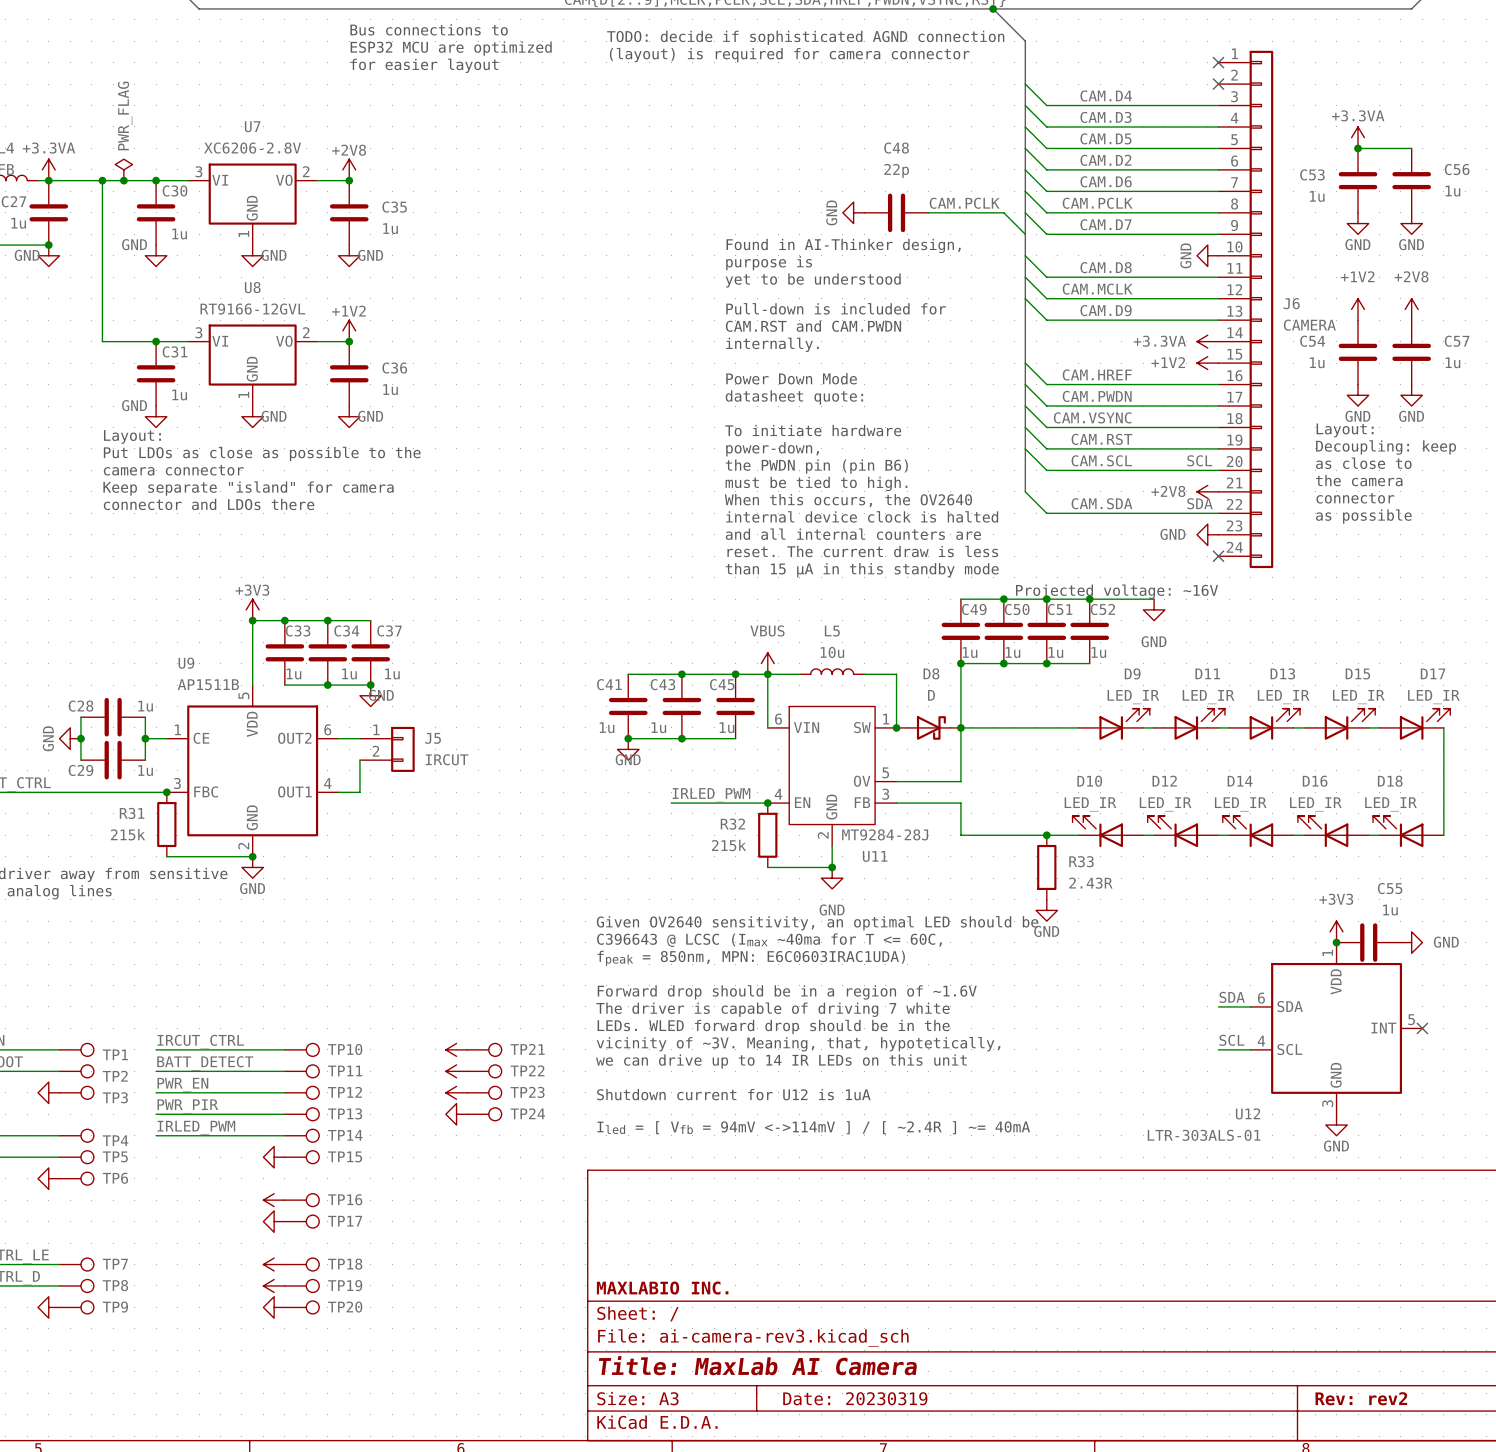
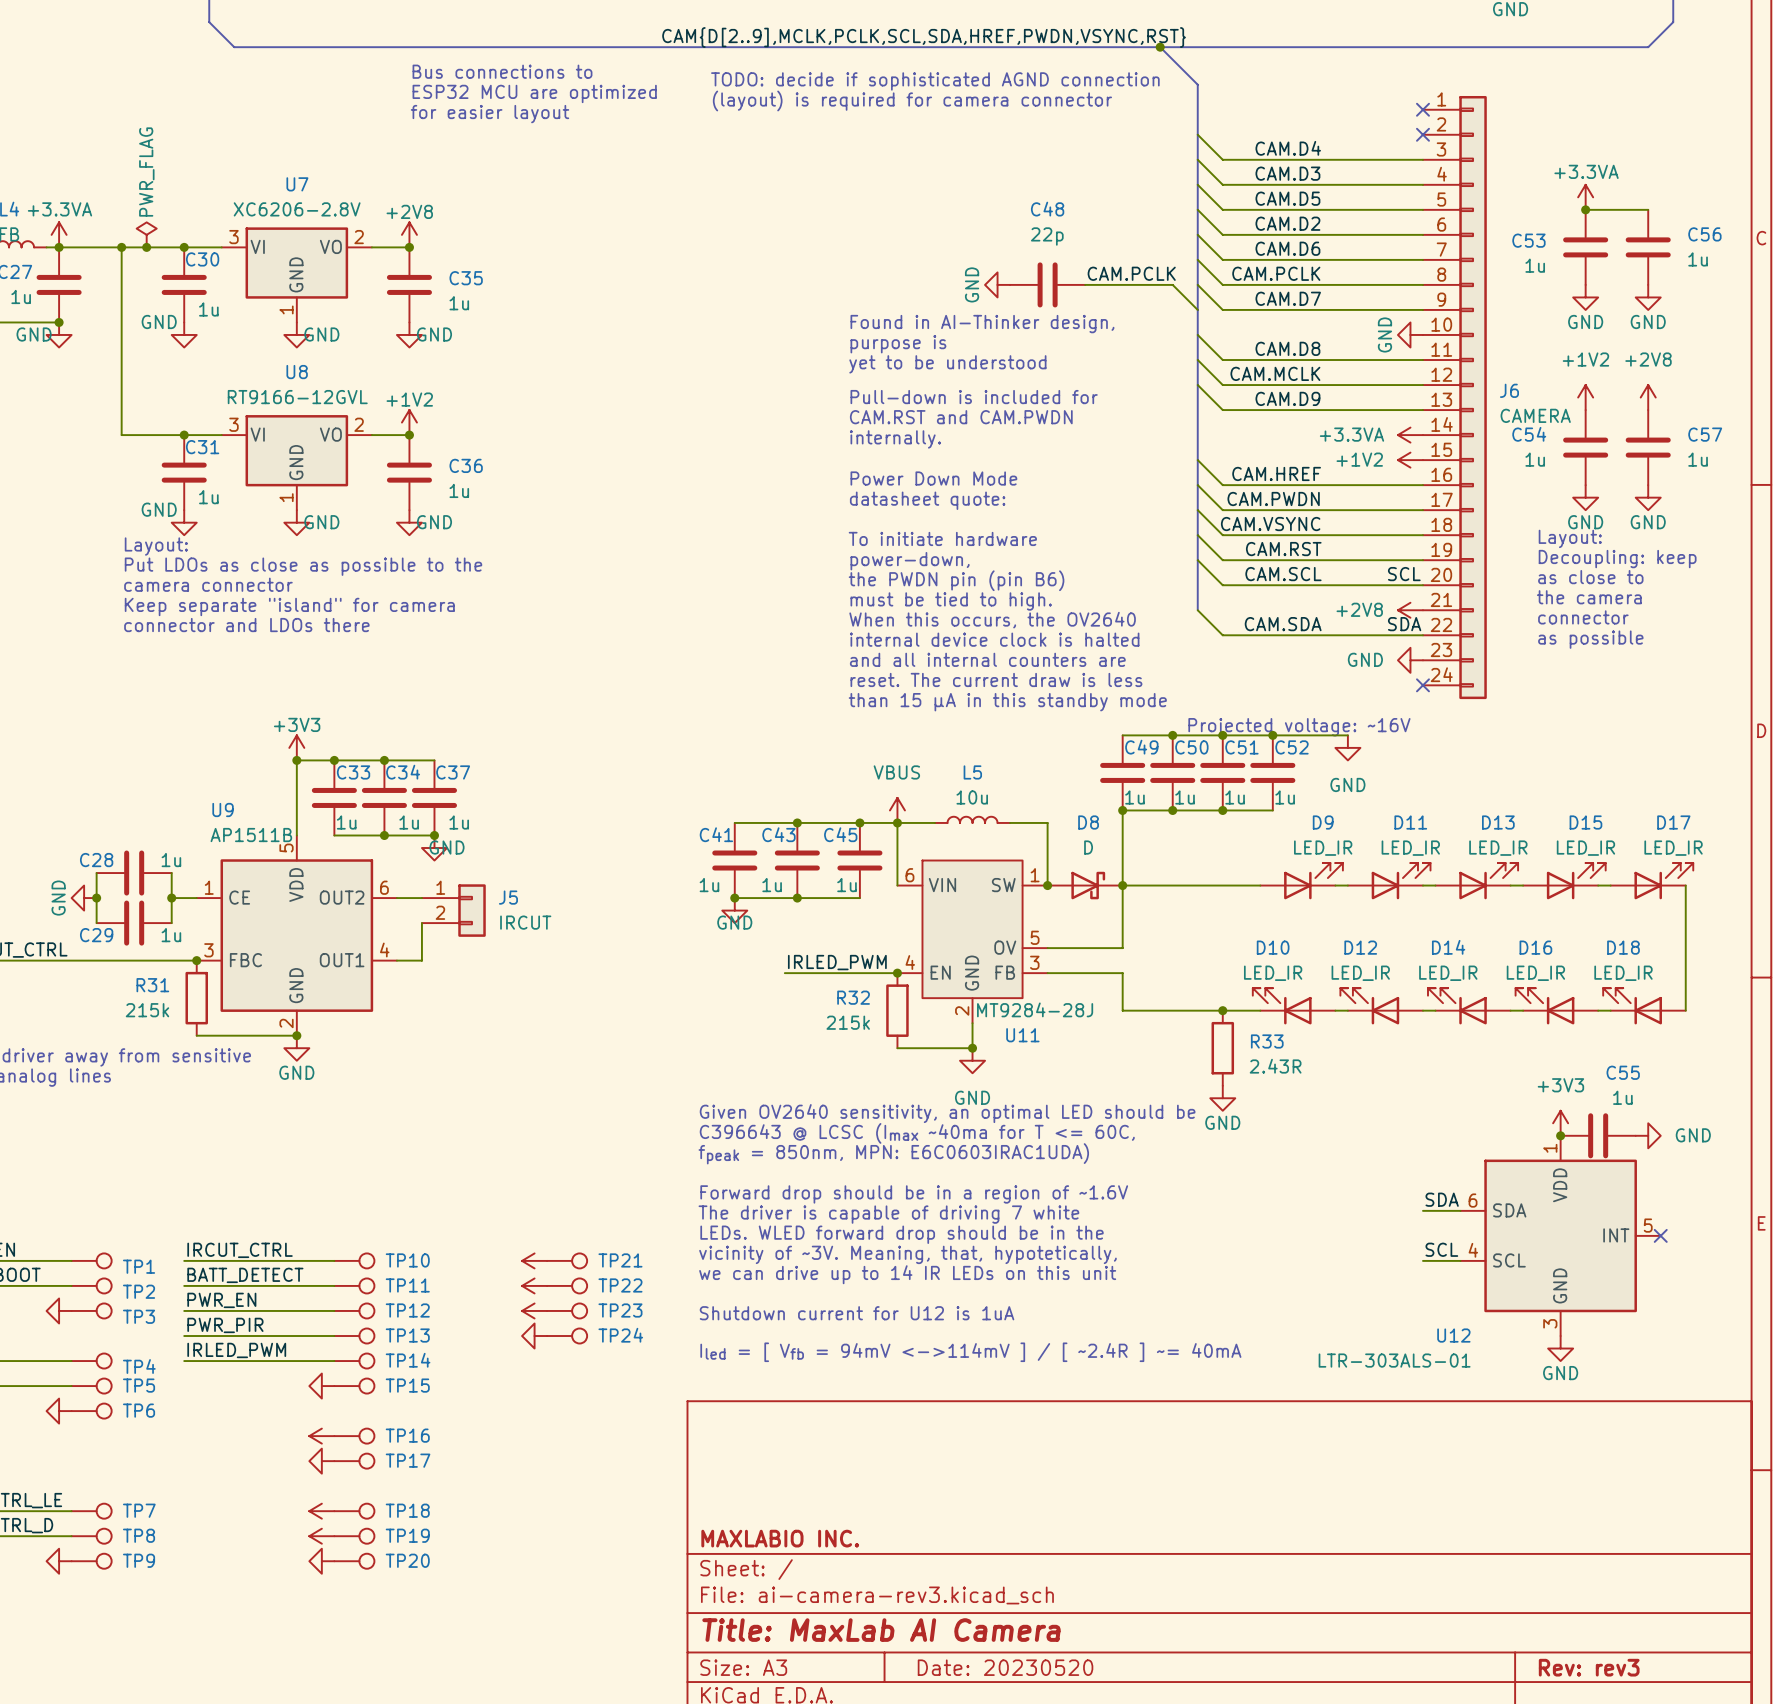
title block: Date: 20230319 (855, 1398) -> Date: 20230520 (1005, 1667)
title block: Rev: rev2 (1361, 1398) -> Rev: rev3 (1589, 1667)

